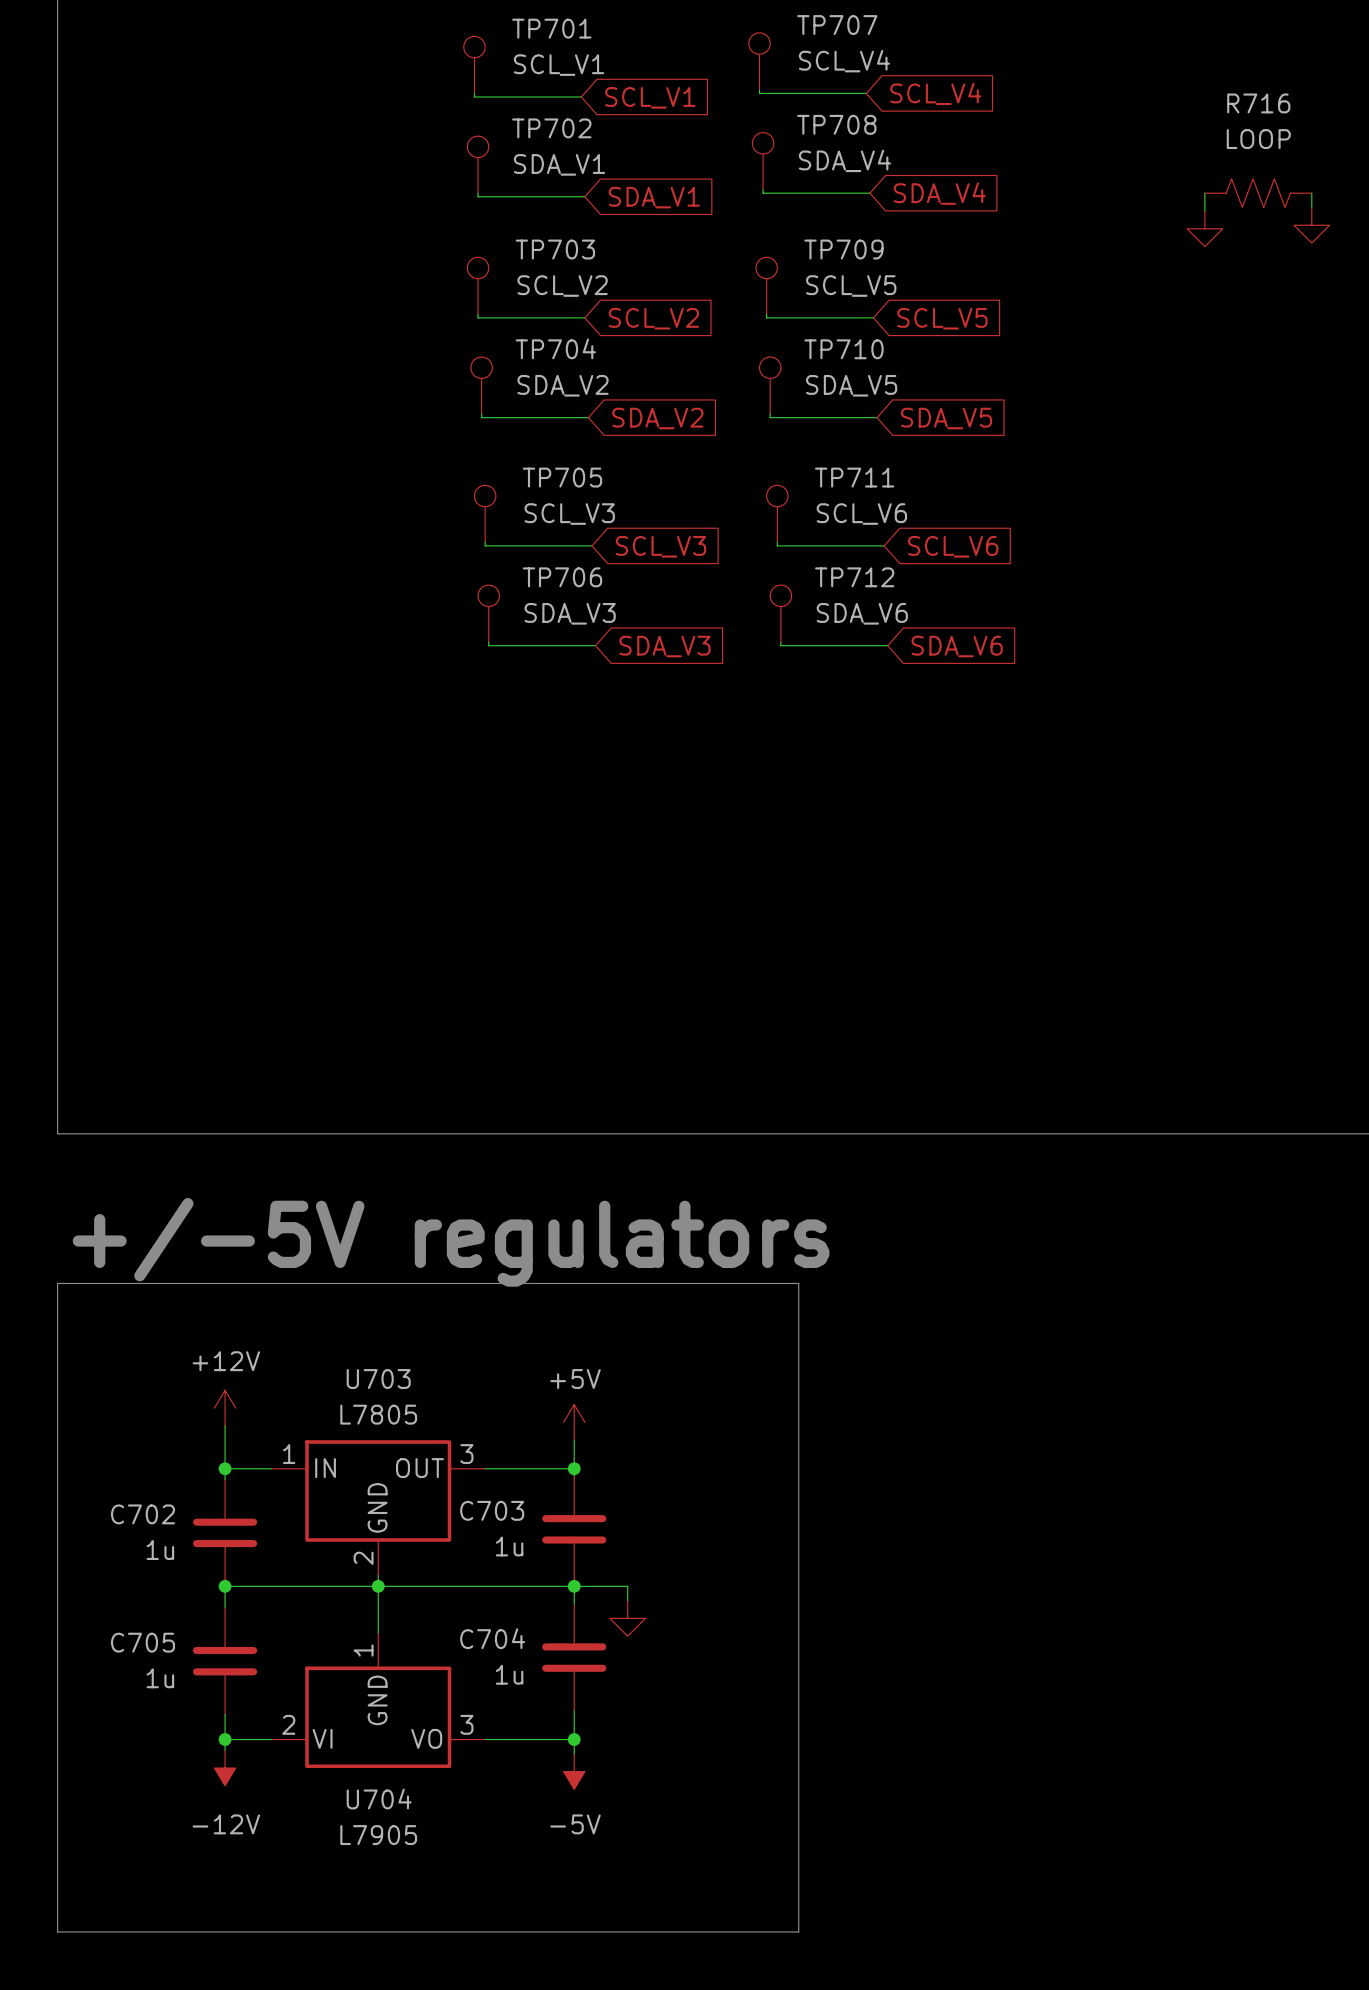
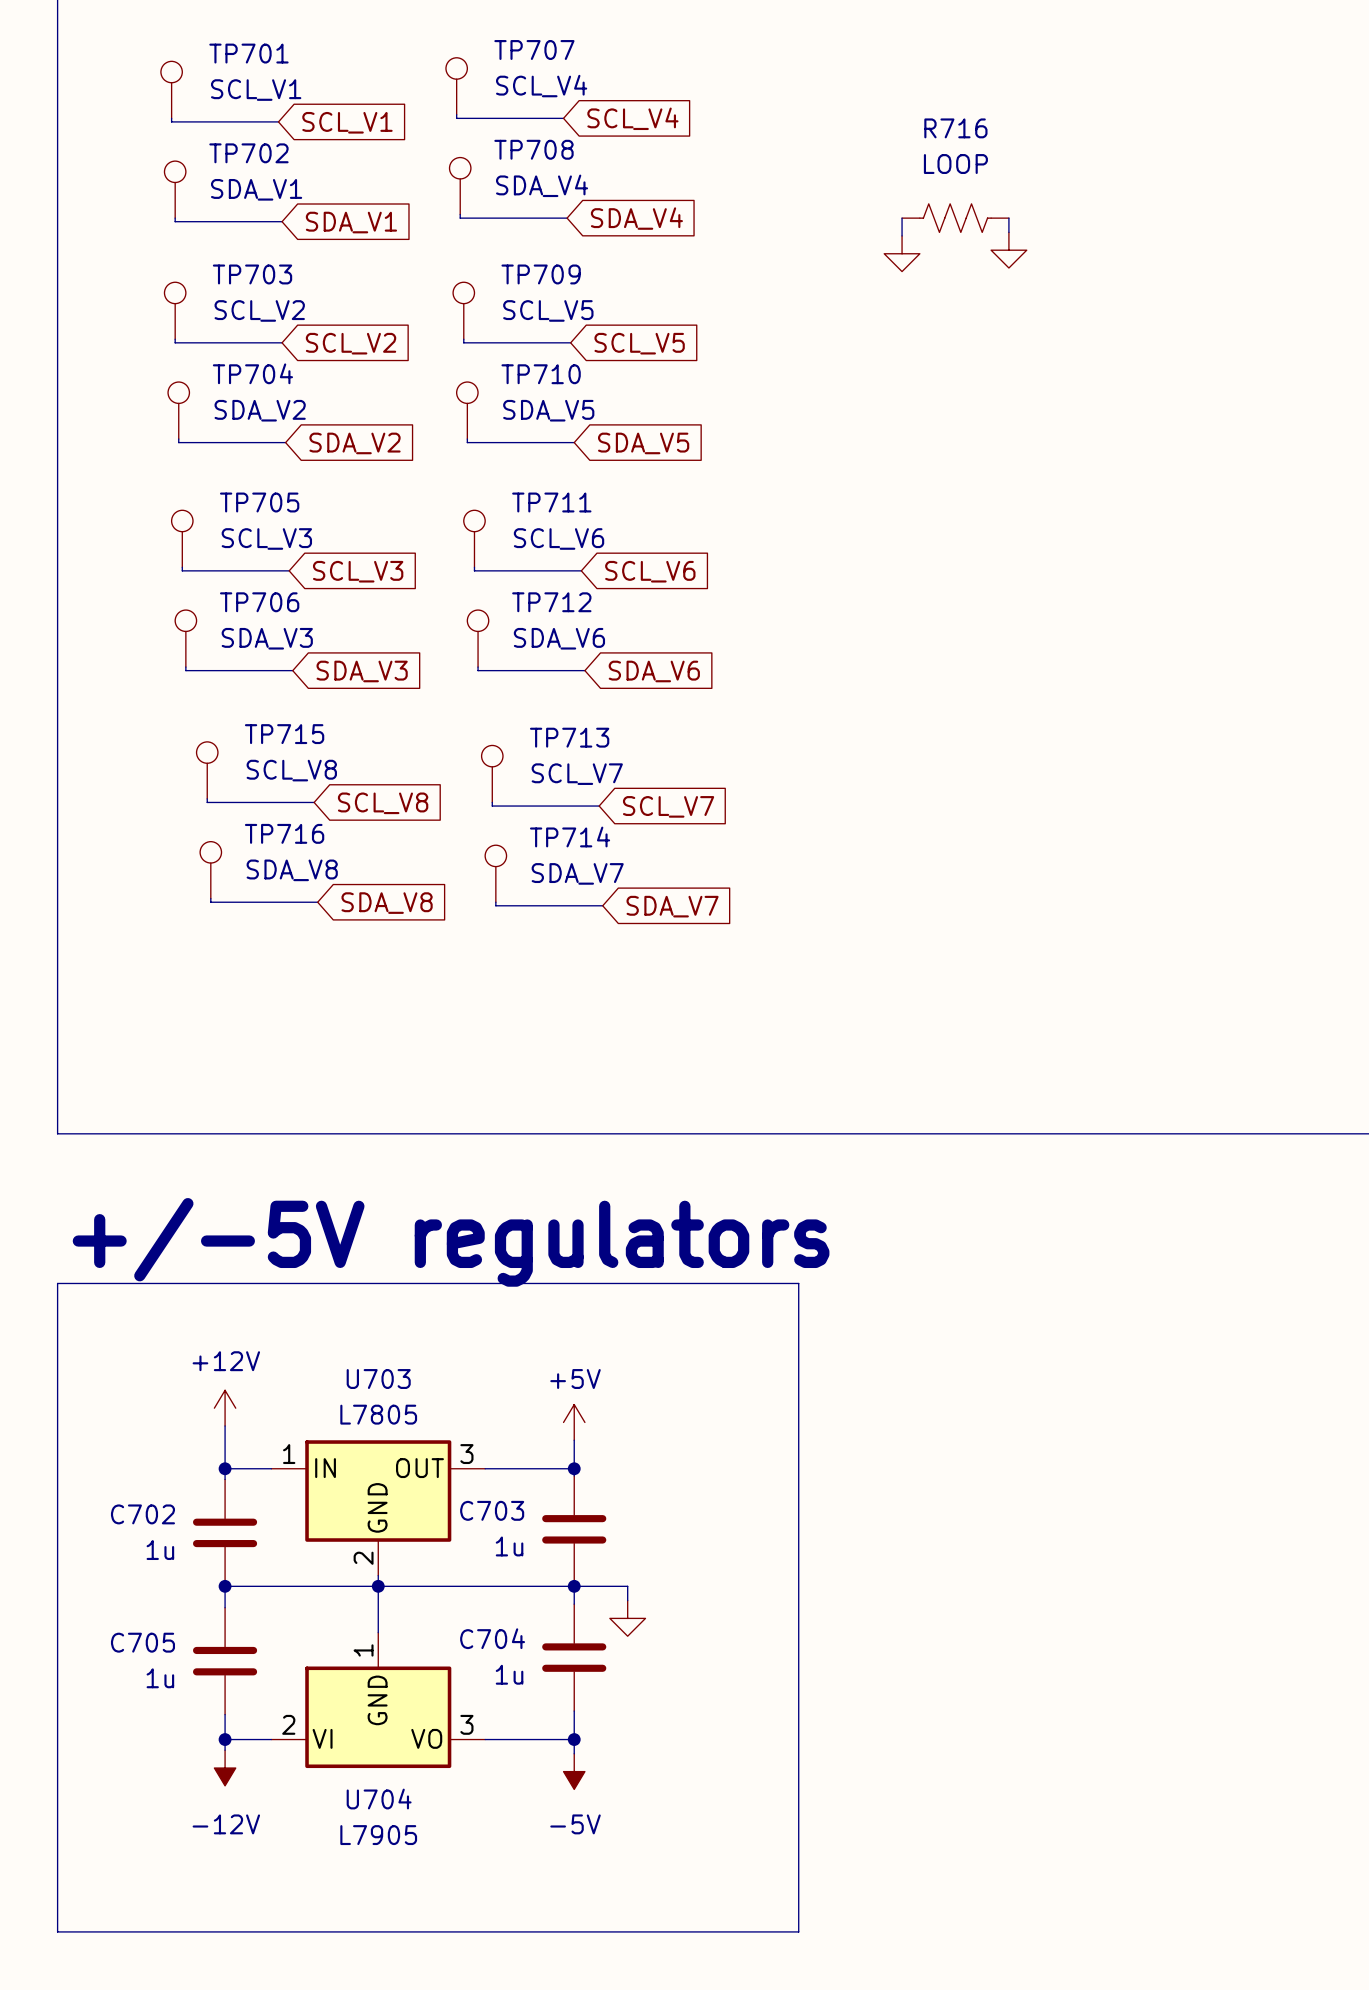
TP707 position: (759, 61) -> (456, 86)
TP701 position: (474, 64) -> (171, 89)
wire: (759, 89) (759, 93) (866, 93) -> (456, 114) (456, 118) (563, 118)
wire: (474, 93) (474, 96) (581, 96) -> (171, 118) (171, 121) (278, 121)
global label position: SCL_V4 (935, 93) -> SCL_V4 (632, 118)
global label position: SCL_V1 (650, 97) -> SCL_V1 (347, 122)
TP708 position: (763, 161) -> (460, 186)
TP702 position: (478, 164) -> (175, 189)
wire: (763, 189) (763, 193) (869, 193) -> (460, 214) (460, 218) (567, 218)
wire: (478, 193) (478, 196) (584, 196) -> (175, 218) (175, 221) (282, 221)
global label position: SDA_V4 (939, 193) -> SDA_V4 (636, 218)
wire: (1204, 193) (1204, 211) -> (902, 218) (902, 235)
R716 position: (1258, 193) -> (955, 218)
wire: (1311, 193) (1311, 207) -> (1008, 218) (1008, 232)
global label position: SDA_V1 (654, 197) -> SDA_V1 (351, 222)
power symbol: (1311, 225) -> none
power symbol: (1204, 228) -> none
power symbol: none -> (1008, 250)
power symbol: none -> (902, 253)
TP703 position: (478, 285) -> (175, 310)
TP709 position: (766, 285) -> (463, 310)
wire: (478, 314) (478, 317) (584, 317) -> (175, 339) (175, 342) (282, 342)
wire: (766, 314) (766, 317) (873, 317) -> (463, 339) (463, 342) (570, 342)
global label position: SCL_V2 (653, 318) -> SCL_V2 (351, 343)
global label position: SCL_V5 (942, 318) -> SCL_V5 (639, 343)
TP704 position: (481, 385) -> (178, 410)
TP710 position: (770, 385) -> (467, 410)
wire: (481, 414) (481, 417) (588, 417) -> (178, 439) (178, 442) (285, 442)
wire: (770, 414) (770, 417) (877, 417) -> (467, 439) (467, 442) (574, 442)
global label position: SDA_V2 (657, 418) -> SDA_V2 (355, 443)
global label position: SDA_V5 (946, 418) -> SDA_V5 (643, 443)
TP705 position: (485, 513) -> (182, 538)
TP711 position: (777, 513) -> (474, 538)
wire: (485, 542) (485, 545) (592, 545) -> (182, 567) (182, 570) (289, 570)
wire: (777, 542) (777, 545) (884, 545) -> (474, 567) (474, 570) (581, 570)
global label position: SCL_V3 (661, 546) -> SCL_V3 (358, 571)
global label position: SCL_V6 (953, 546) -> SCL_V6 (650, 571)
TP706 position: (488, 613) -> (185, 638)
TP712 position: (780, 613) -> (478, 638)
wire: (488, 642) (488, 645) (595, 645) -> (185, 667) (185, 670) (292, 670)
wire: (780, 642) (780, 645) (887, 645) -> (478, 667) (478, 670) (584, 670)
global label position: SDA_V3 (665, 646) -> SDA_V3 (362, 671)
global label position: SDA_V6 (957, 646) -> SDA_V6 (654, 671)
TP715: none -> SCL_V8 (207, 770)
TP713: none -> SCL_V7 (492, 773)
wire: none -> (207, 798) (207, 802) (314, 802)
wire: none -> (492, 802) (492, 806) (599, 806)
global label: none -> SCL_V8 (383, 803)
global label: none -> SCL_V7 (668, 806)
TP716: none -> SDA_V8 (210, 870)
TP714: none -> SDA_V7 (495, 873)
wire: none -> (210, 898) (210, 902) (317, 902)
wire: none -> (495, 902) (495, 905) (602, 905)
global label: none -> SDA_V8 (387, 903)
global label: none -> SDA_V7 (672, 906)

